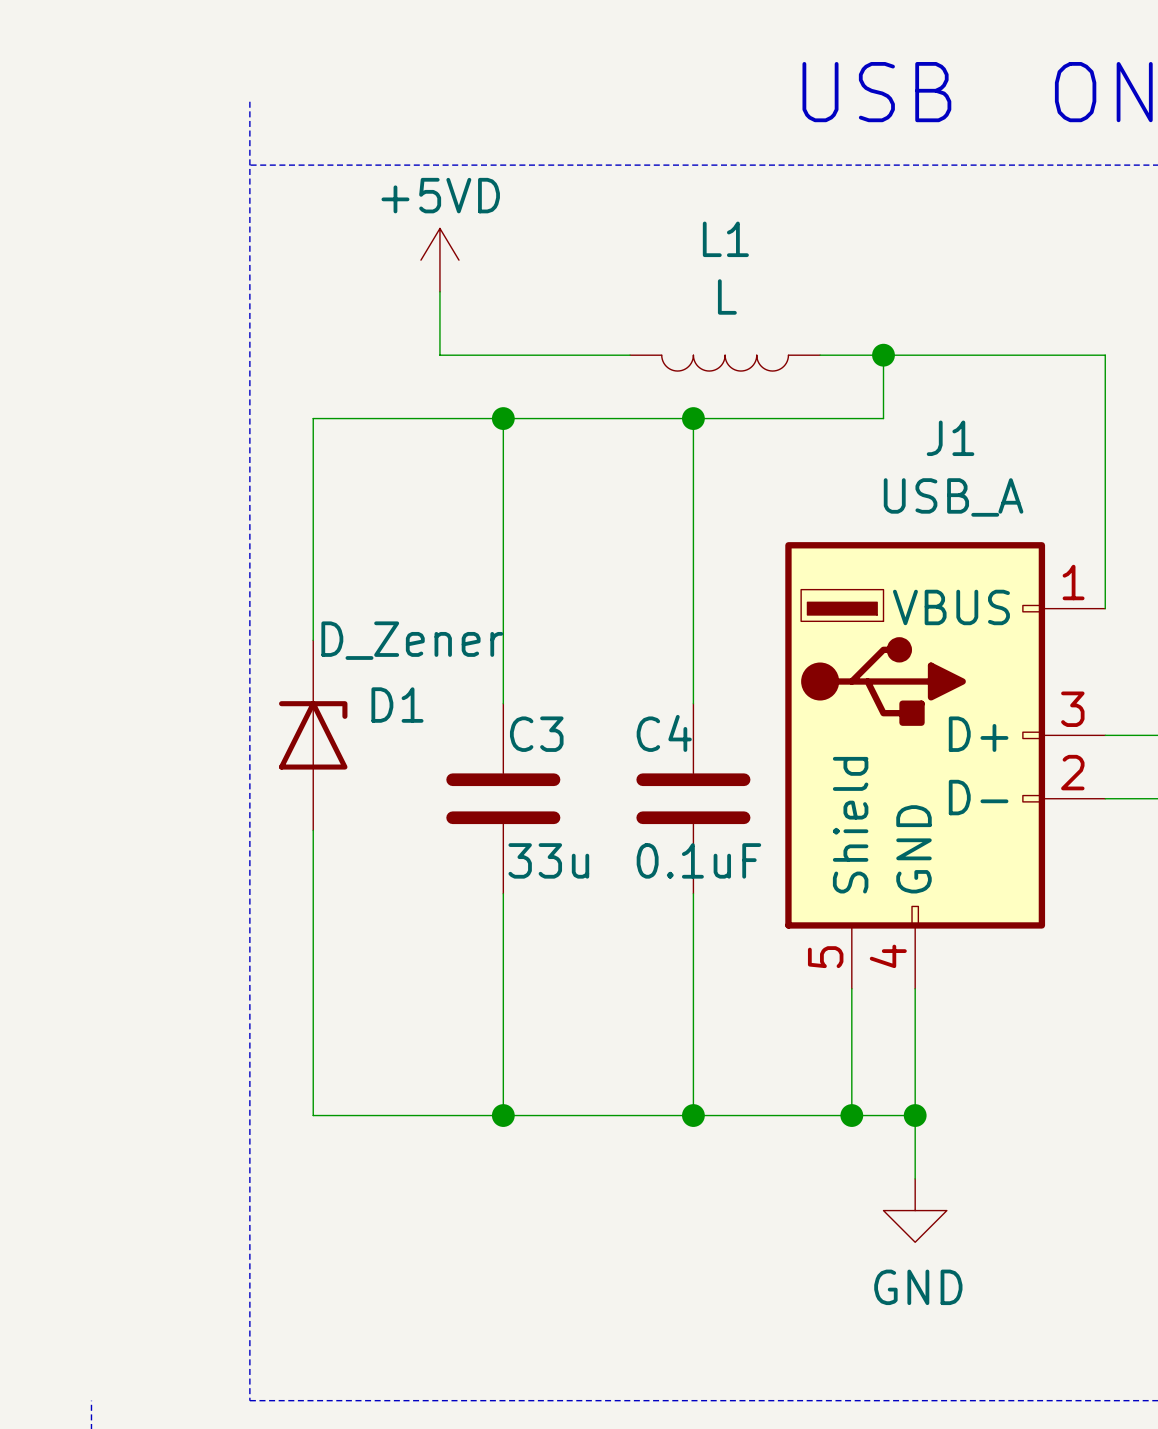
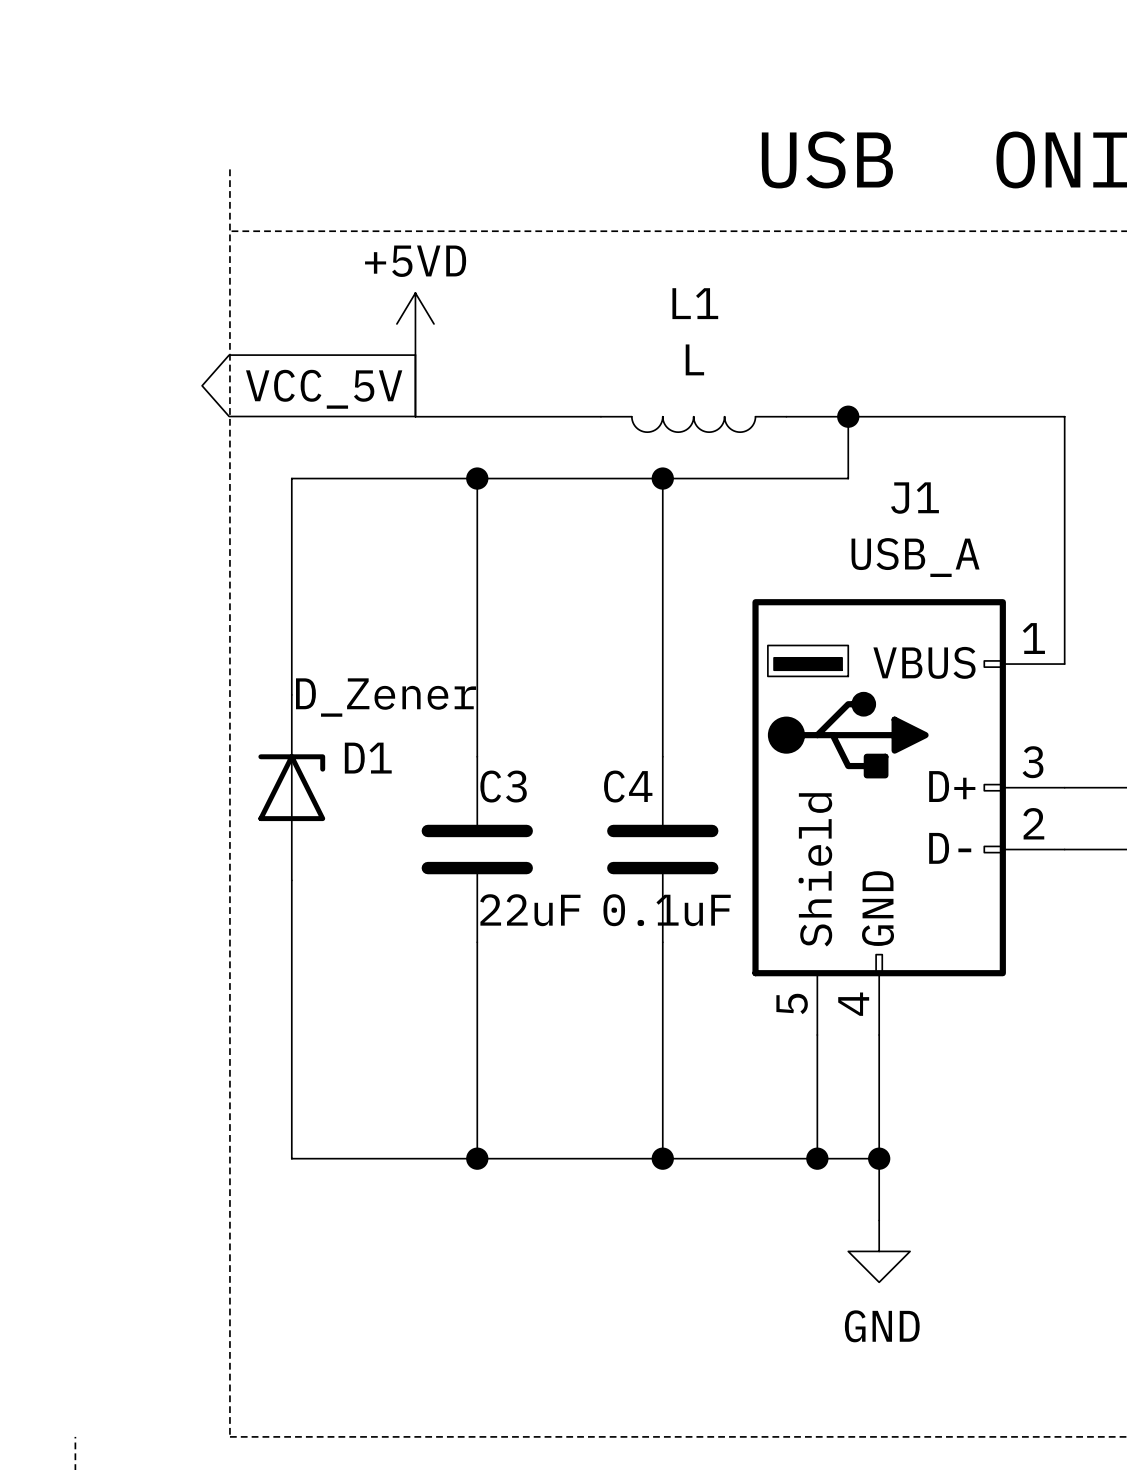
global label: none -> VCC_5V (324, 389)
C3 value: 33u (548, 860) -> 22uF (530, 910)

